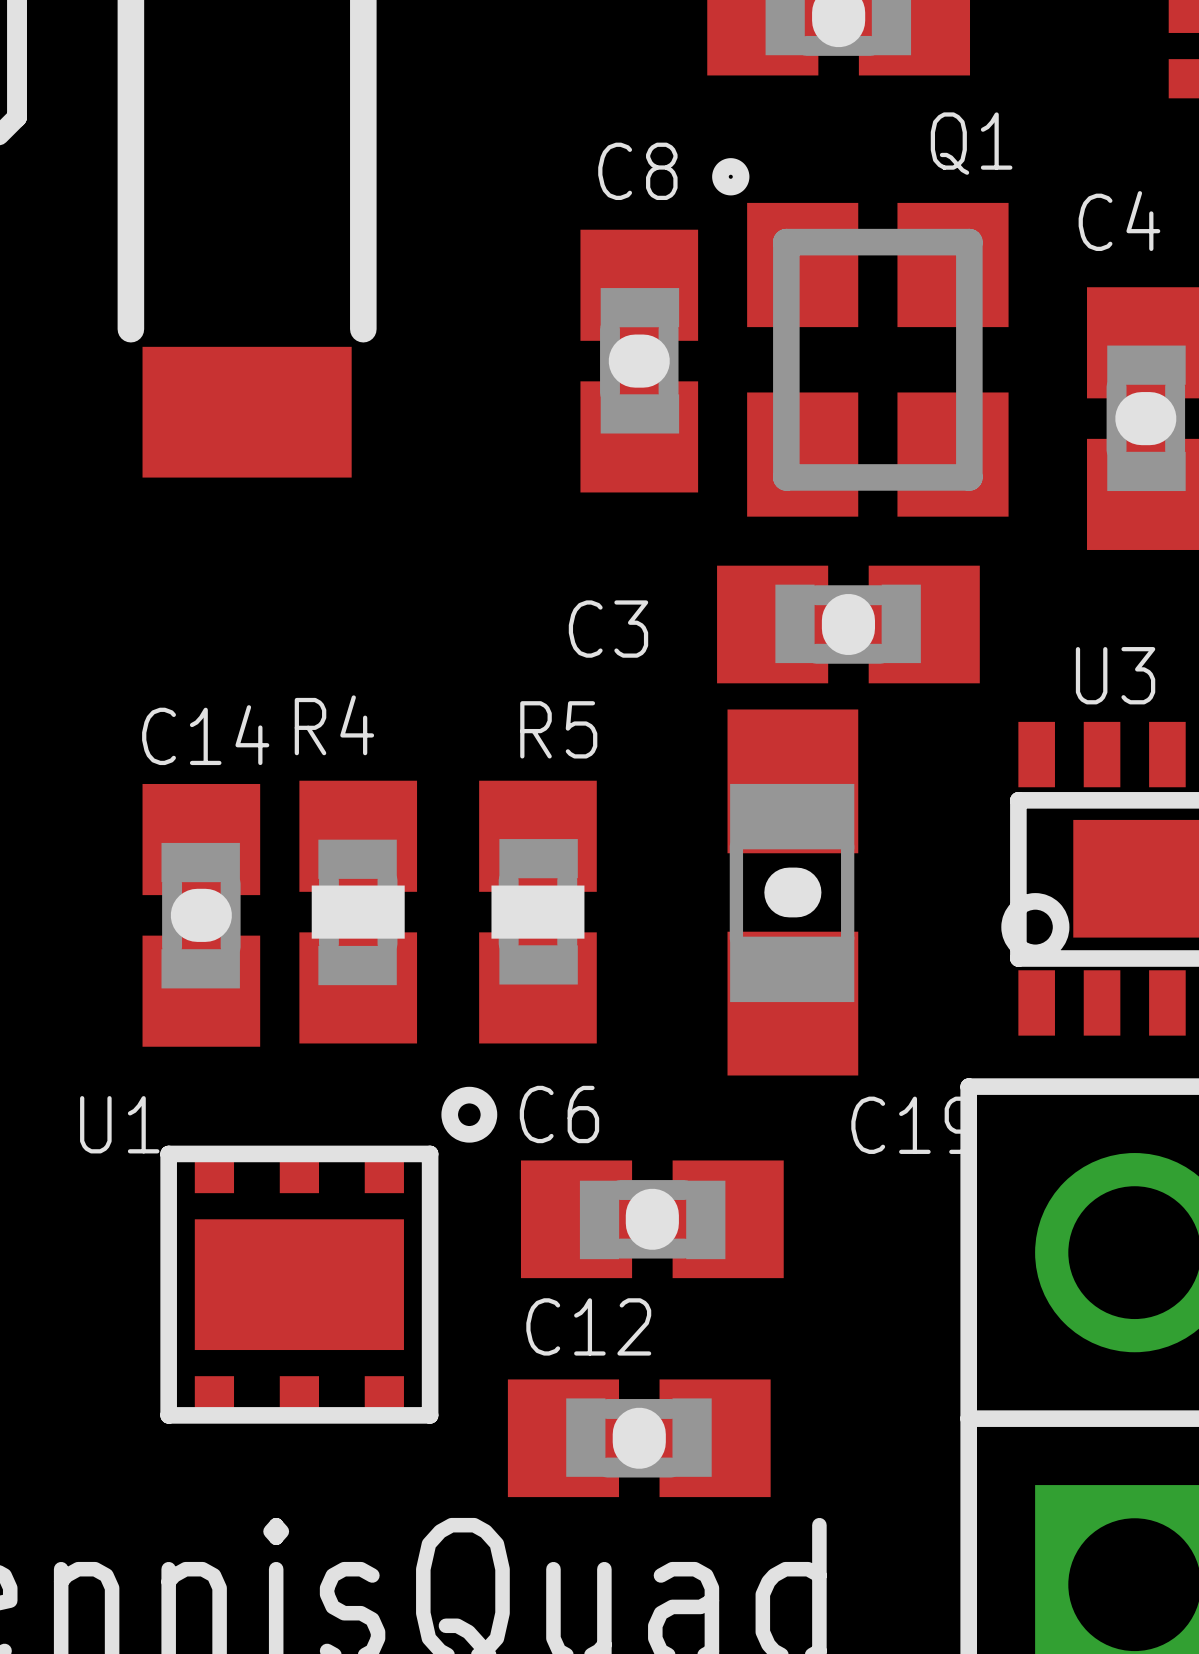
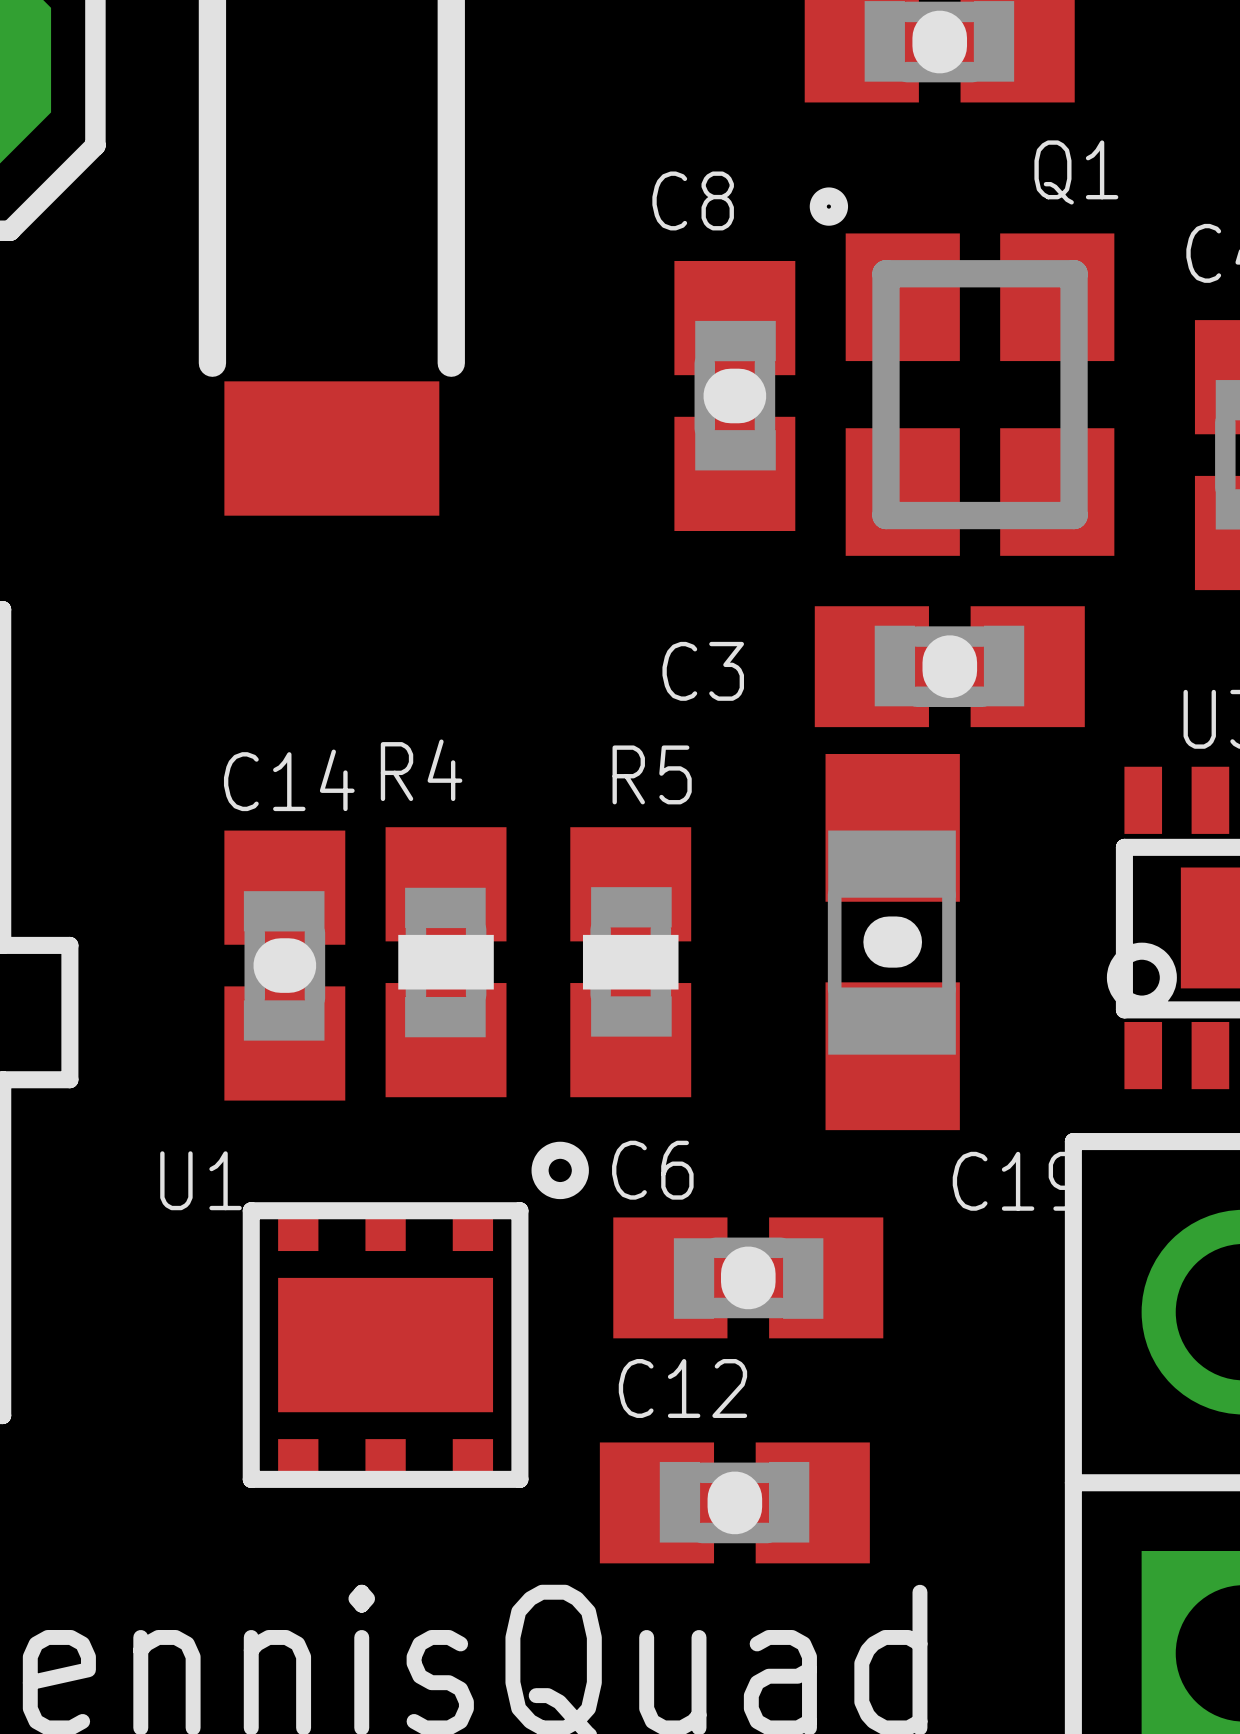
C8 name position: C8 (637, 171) -> C8 (693, 200)

